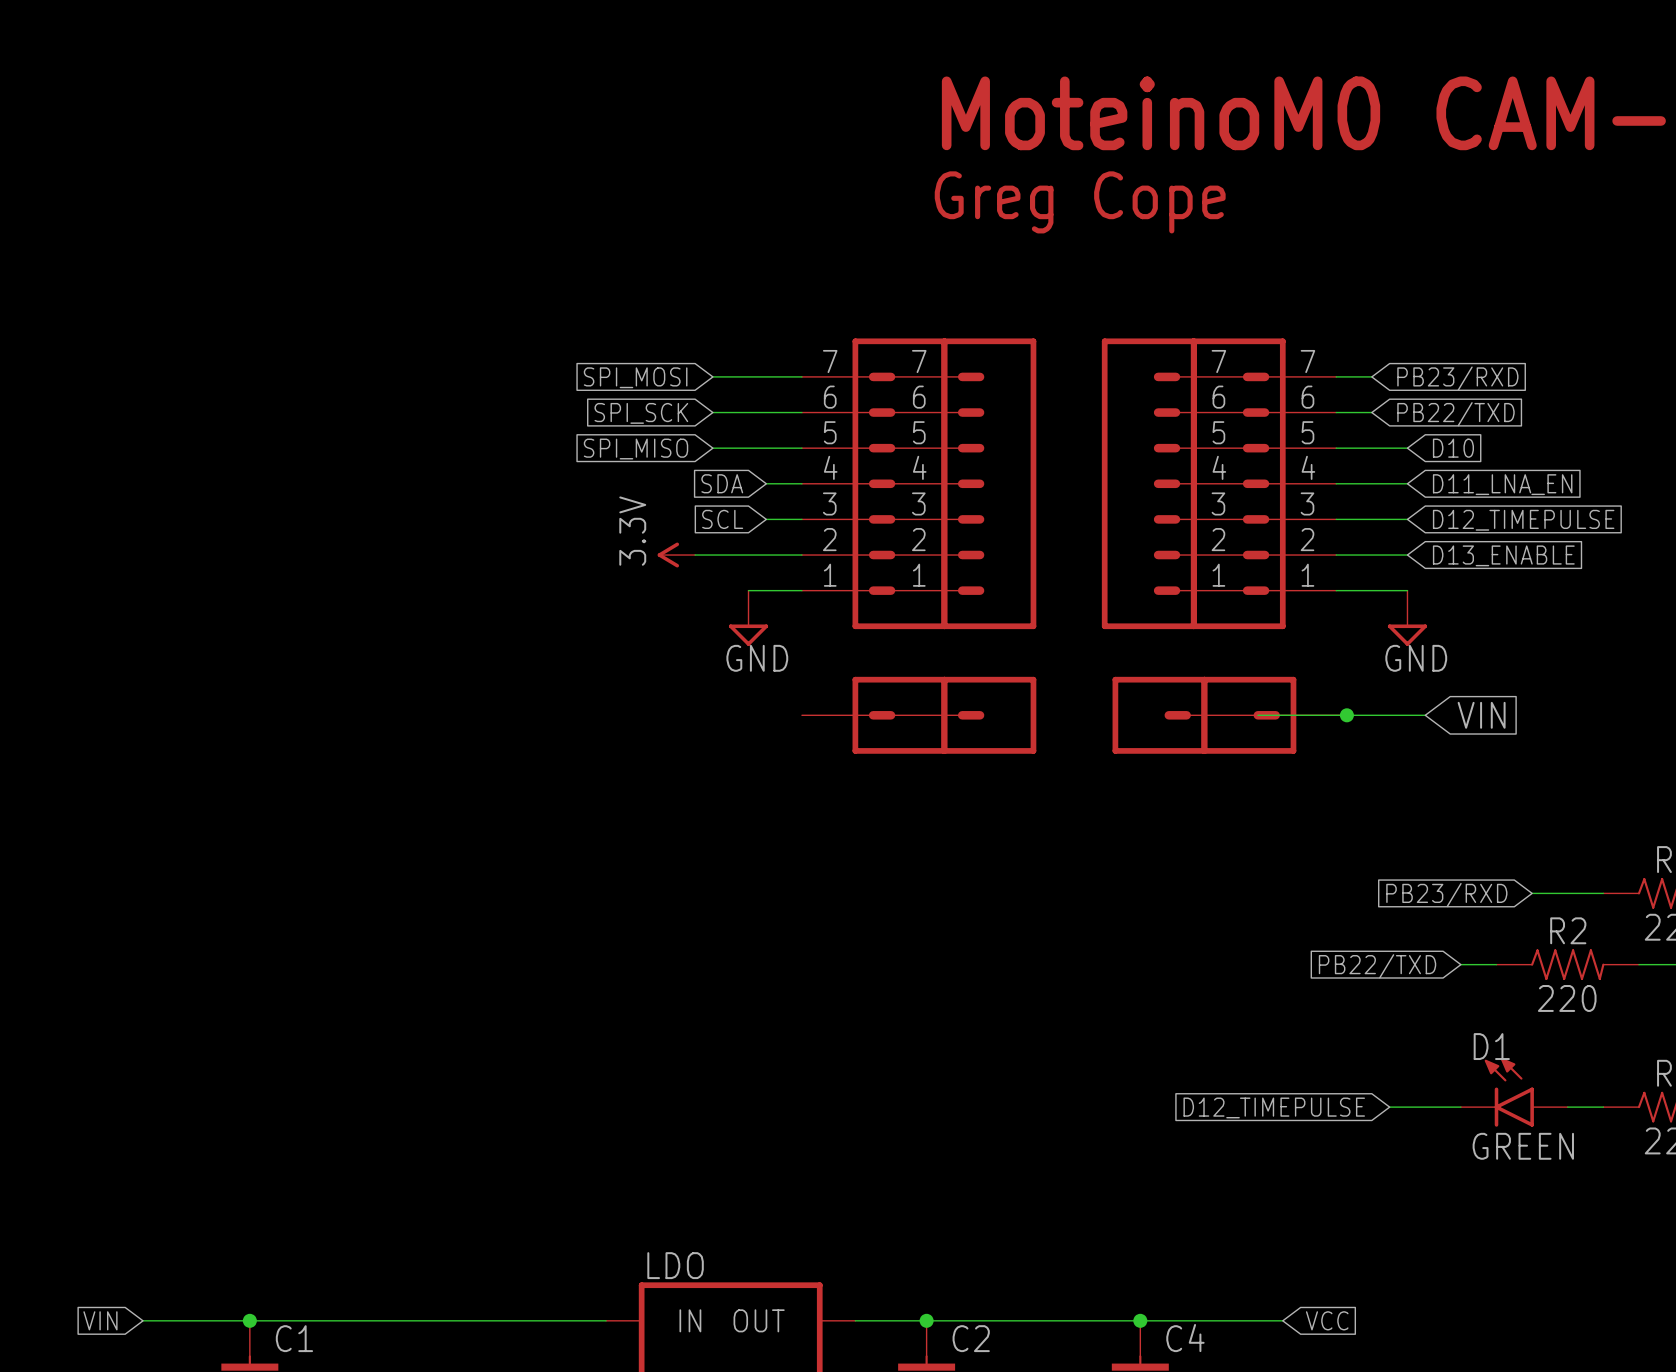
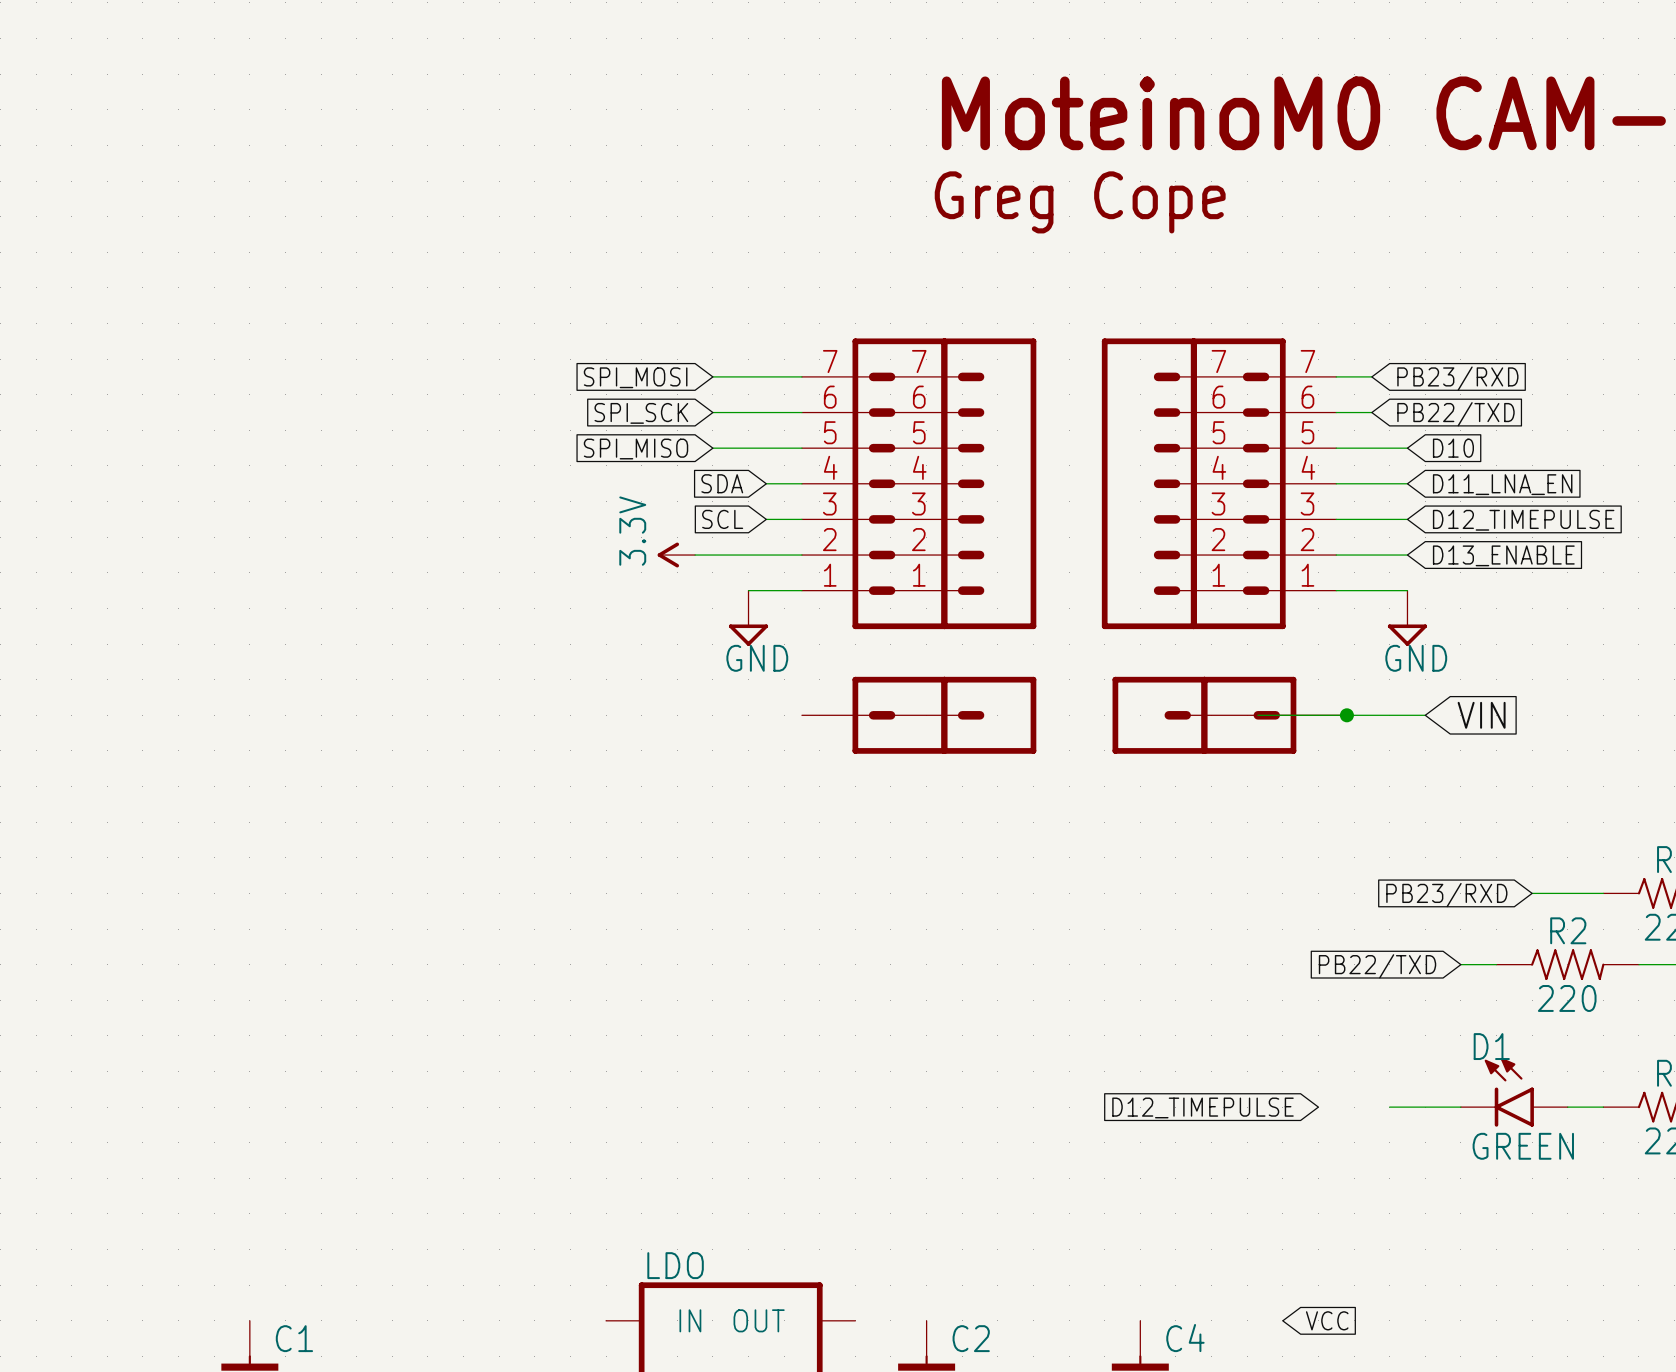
global label position: D12_TIMEPULSE (1274, 1107) -> D12_TIMEPULSE (1202, 1107)
global label: VIN (100, 1320) -> none
wire: (142, 1320) (606, 1320) -> none
junction: (249, 1320) -> none
wire: (855, 1320) (1282, 1320) -> none
junction: (926, 1320) -> none
junction: (1140, 1320) -> none

